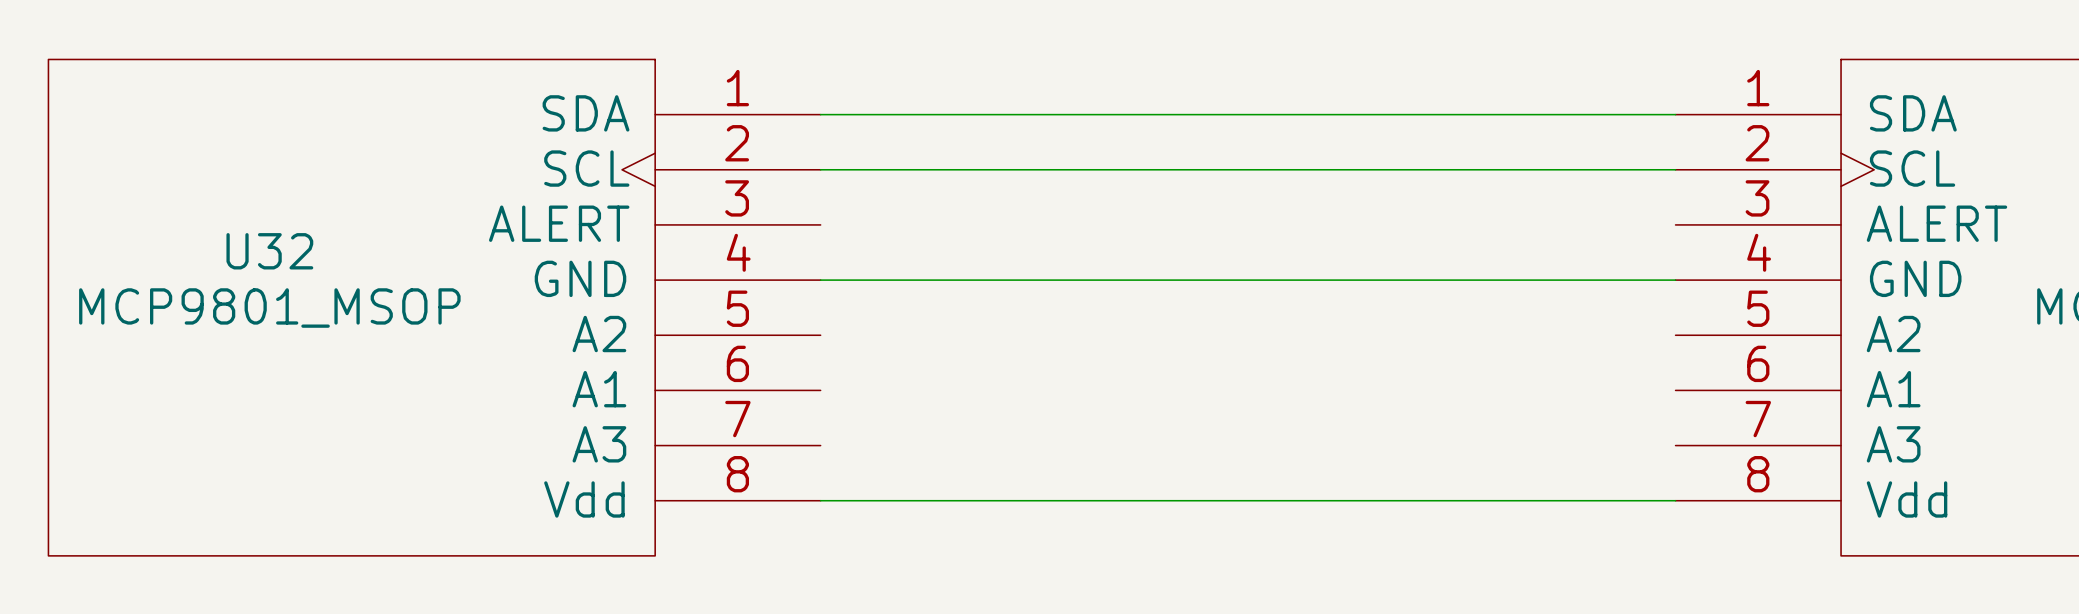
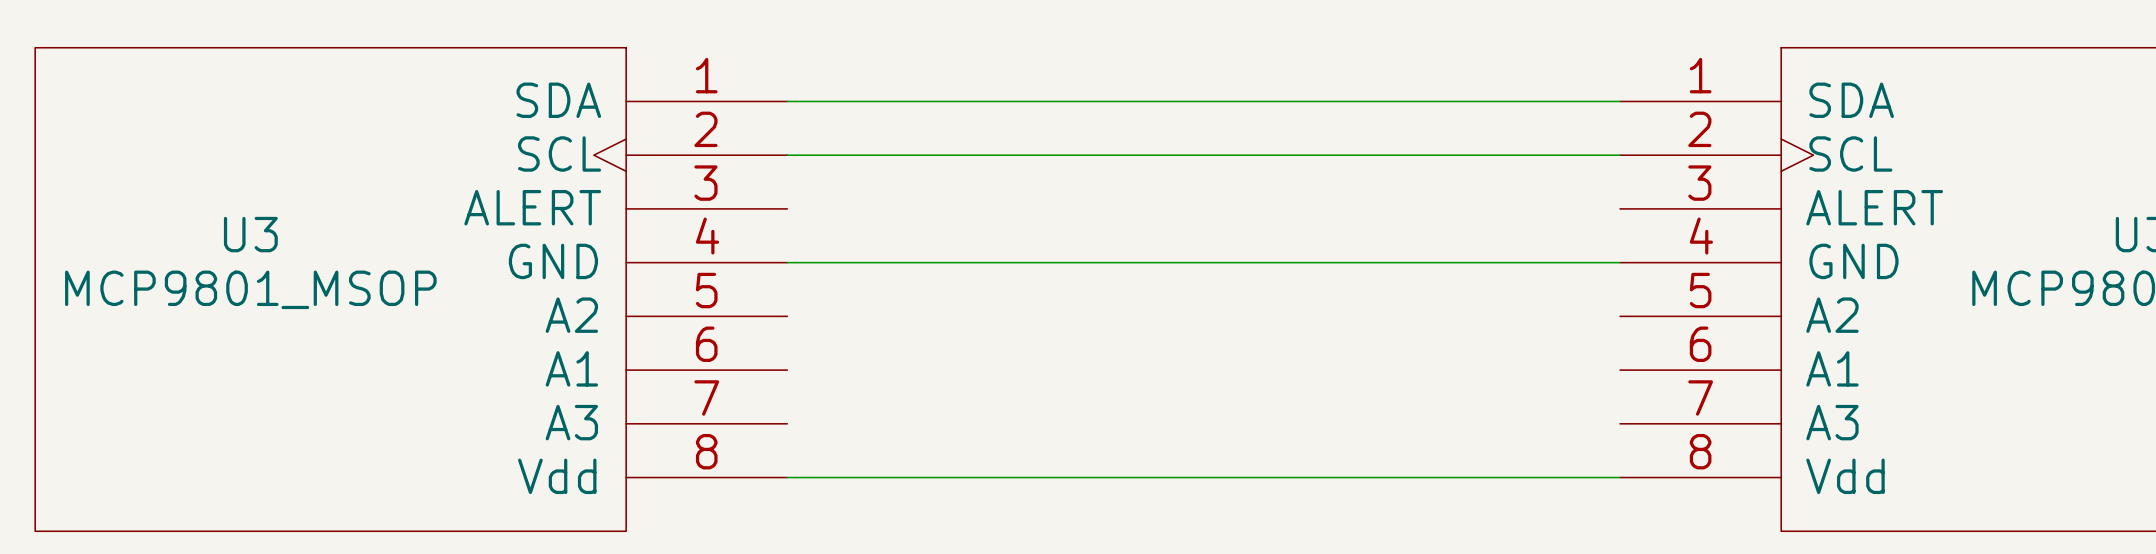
U32 name: U32 (269, 251) -> U3 (250, 234)

